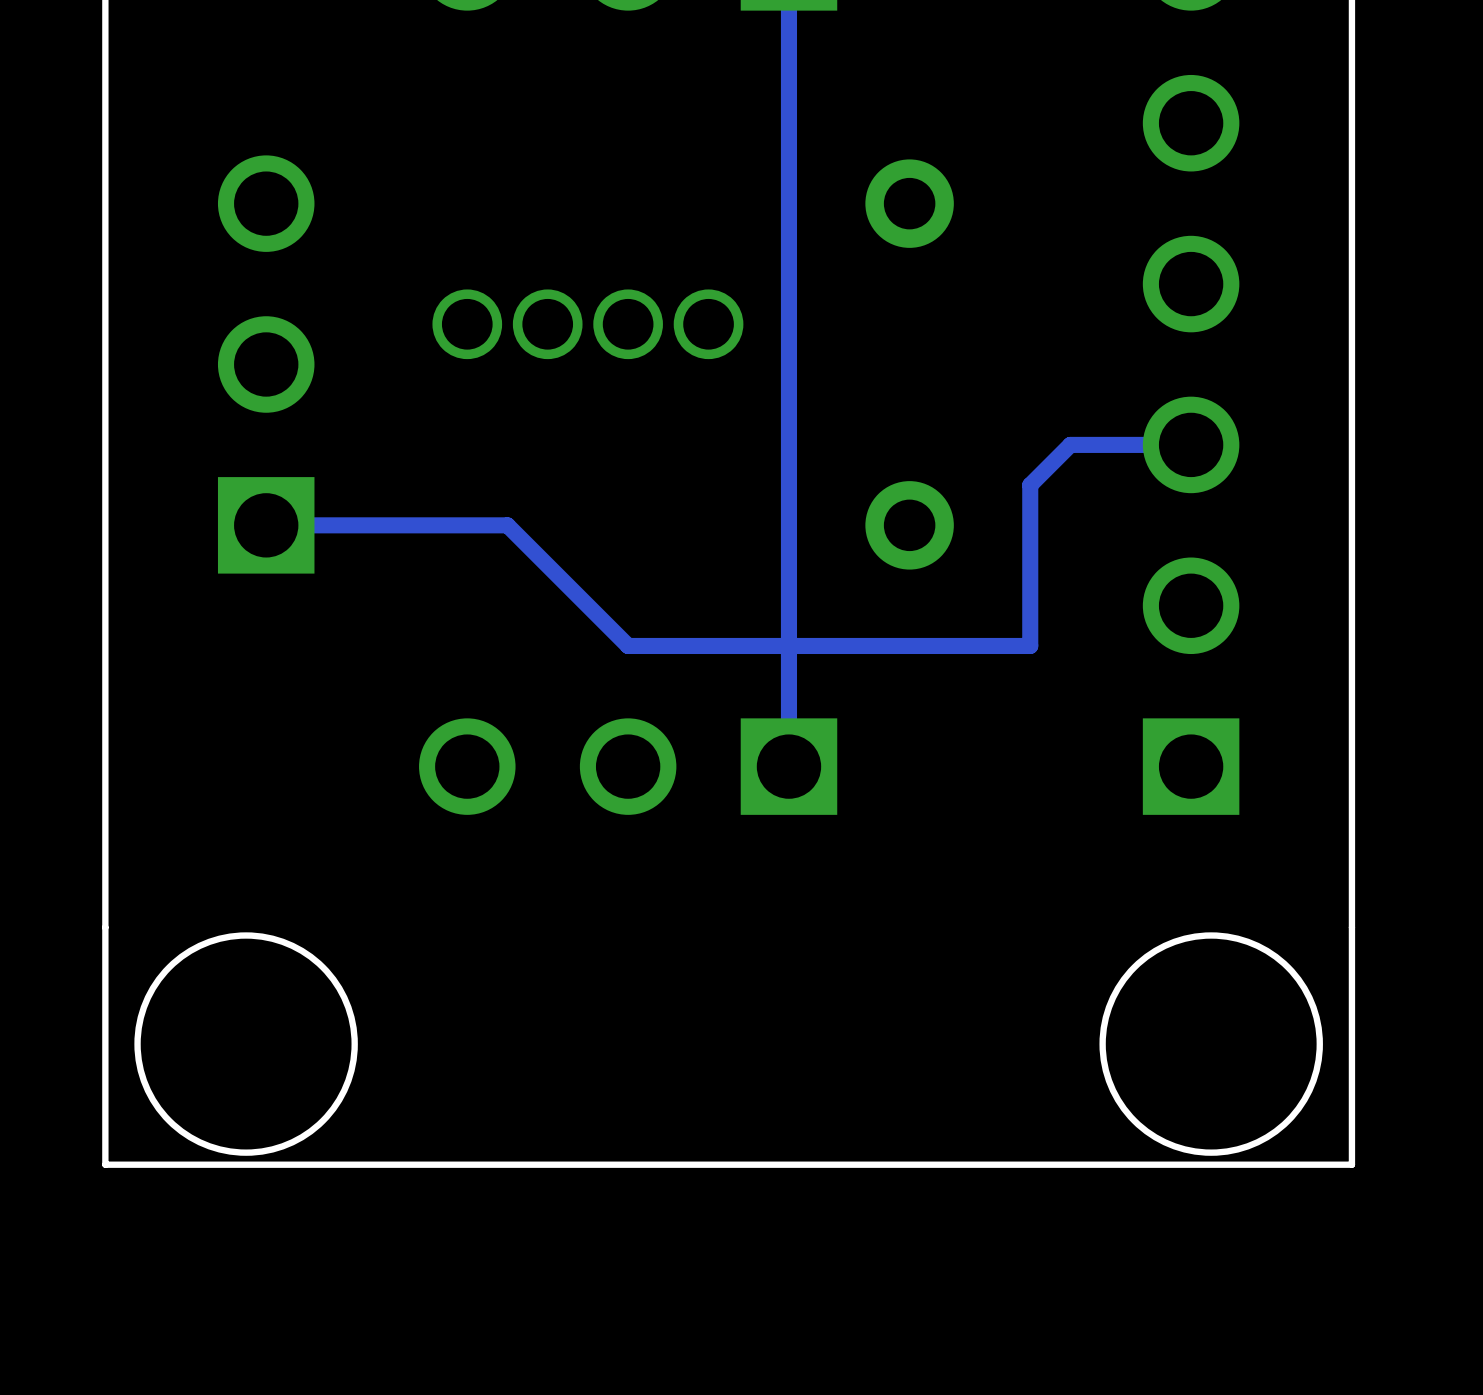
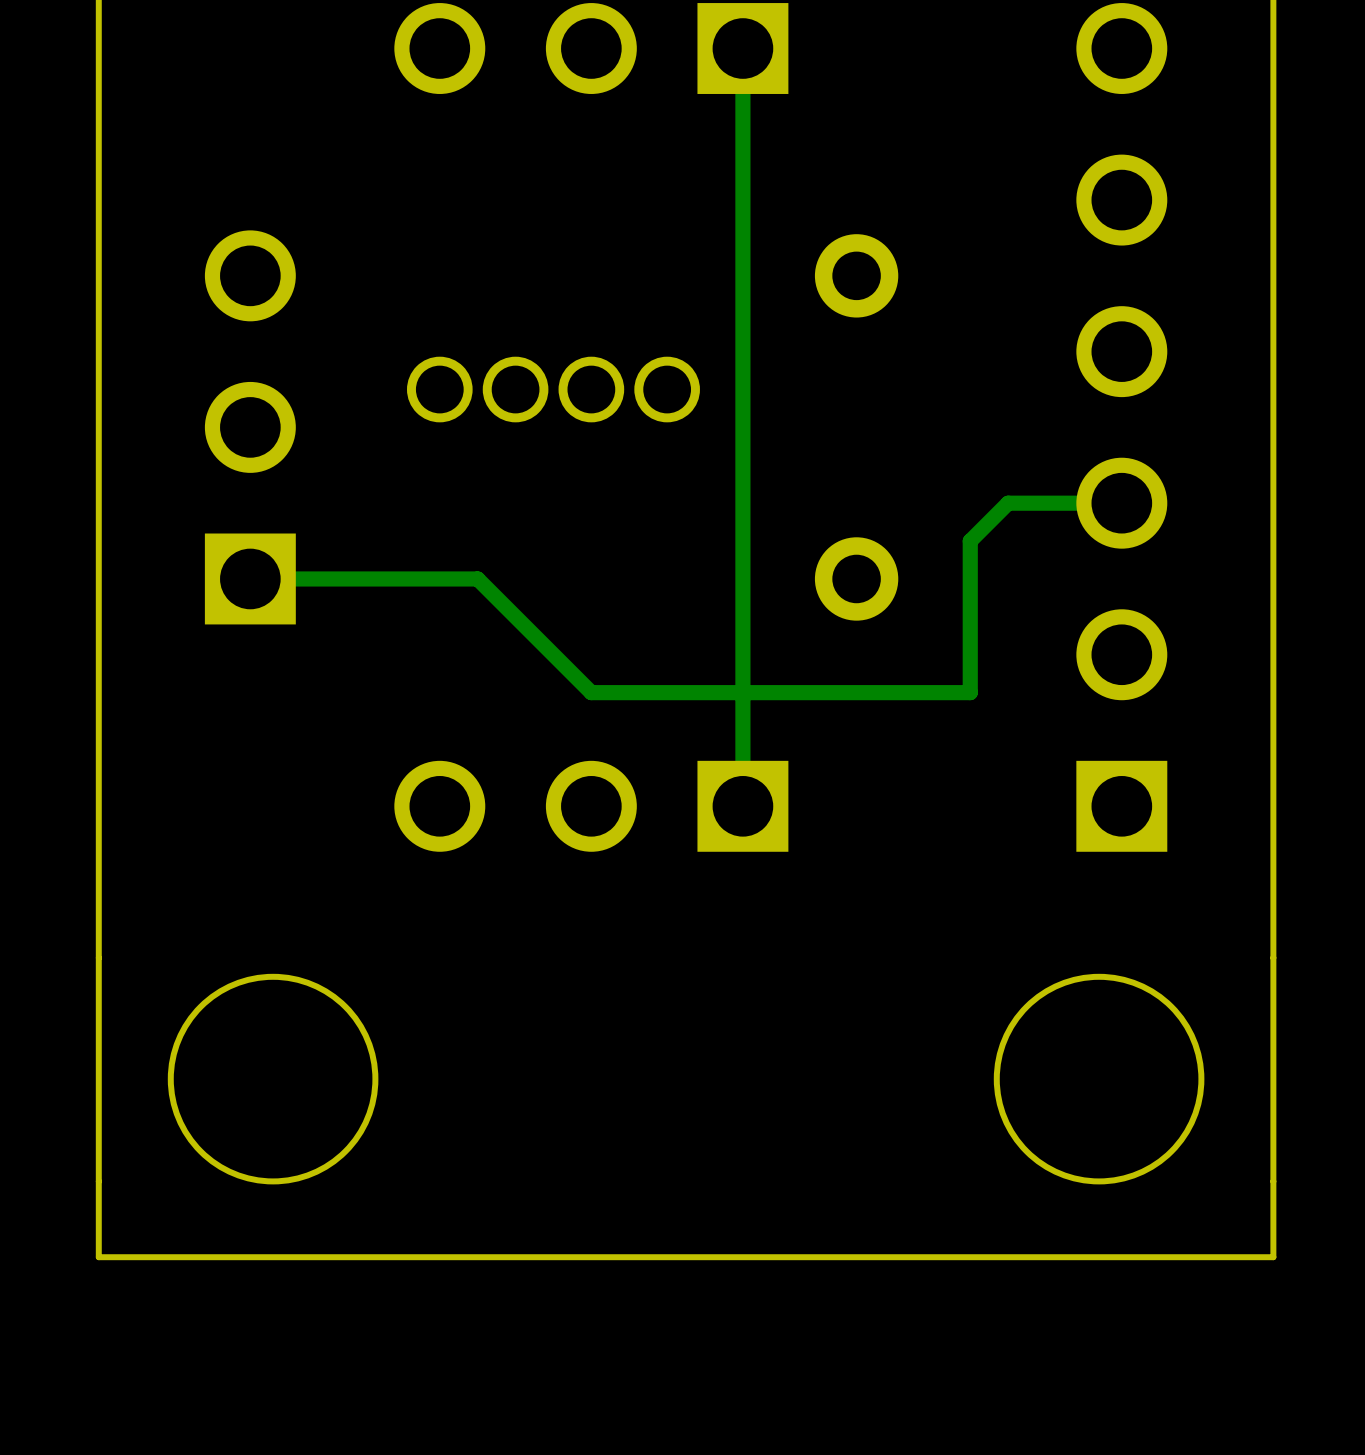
round board edge position: (246, 1044) -> (273, 1079)
round board edge position: (1211, 1044) -> (1099, 1079)
board edge: (1351, 1164) (105, 1164) -> (1273, 1181) (1273, 1257) (98, 1257) (98, 1181)

